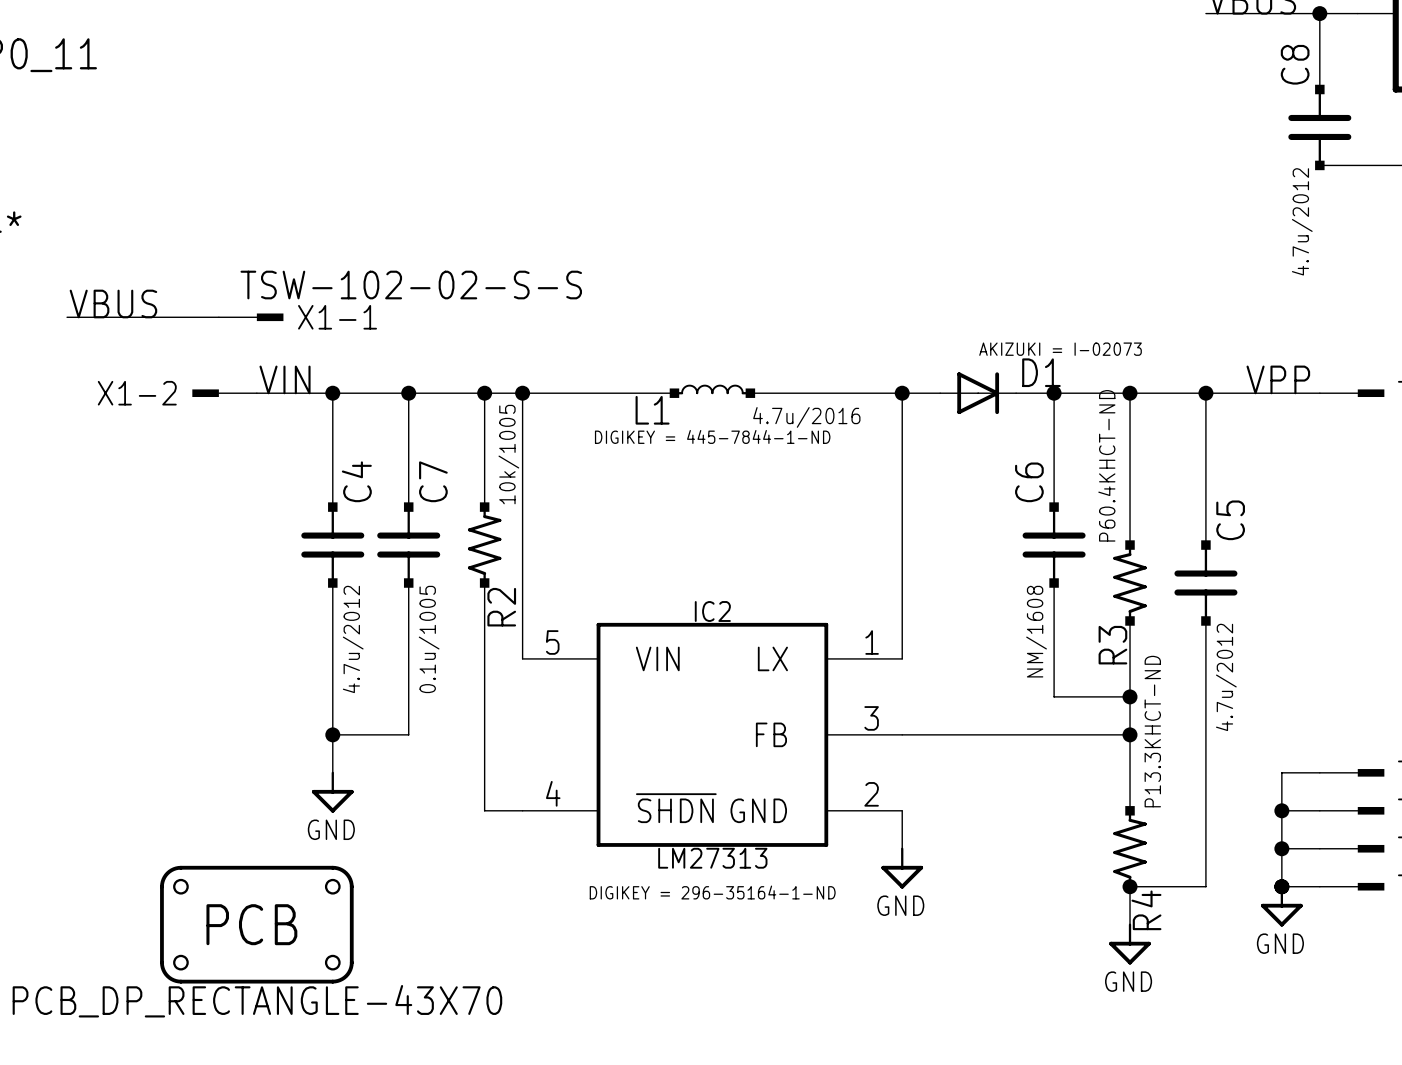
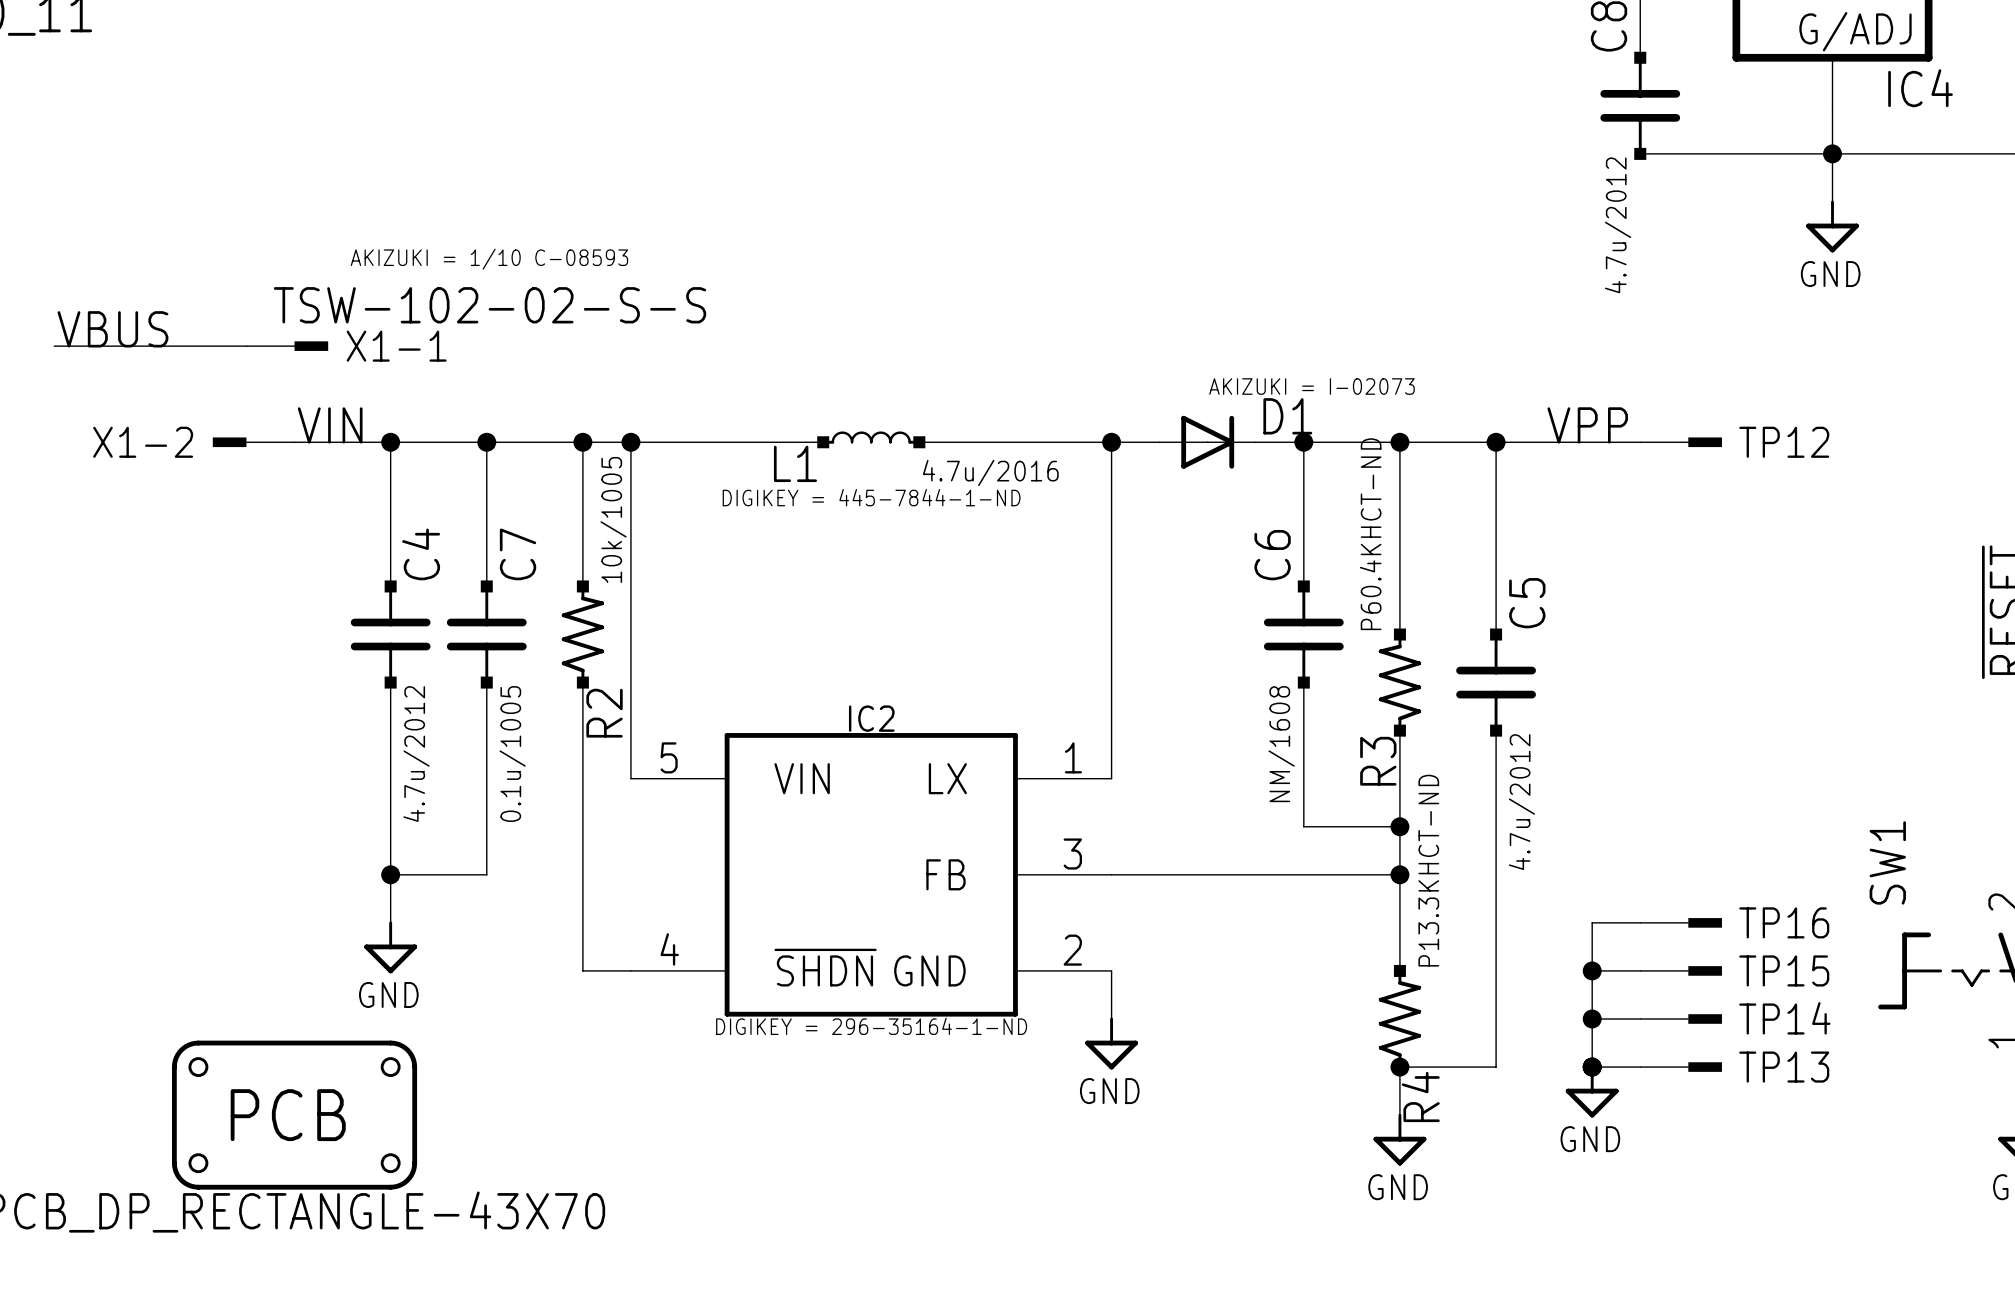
X1-1 text: none -> AKIZUKI = 1/10 C-08593 (489, 259)
IC2 value: LM27313 (712, 858) -> none
IC2 text position: DIGIKEY = 296-35164-1-ND (712, 892) -> DIGIKEY = 296-35164-1-ND (871, 1026)

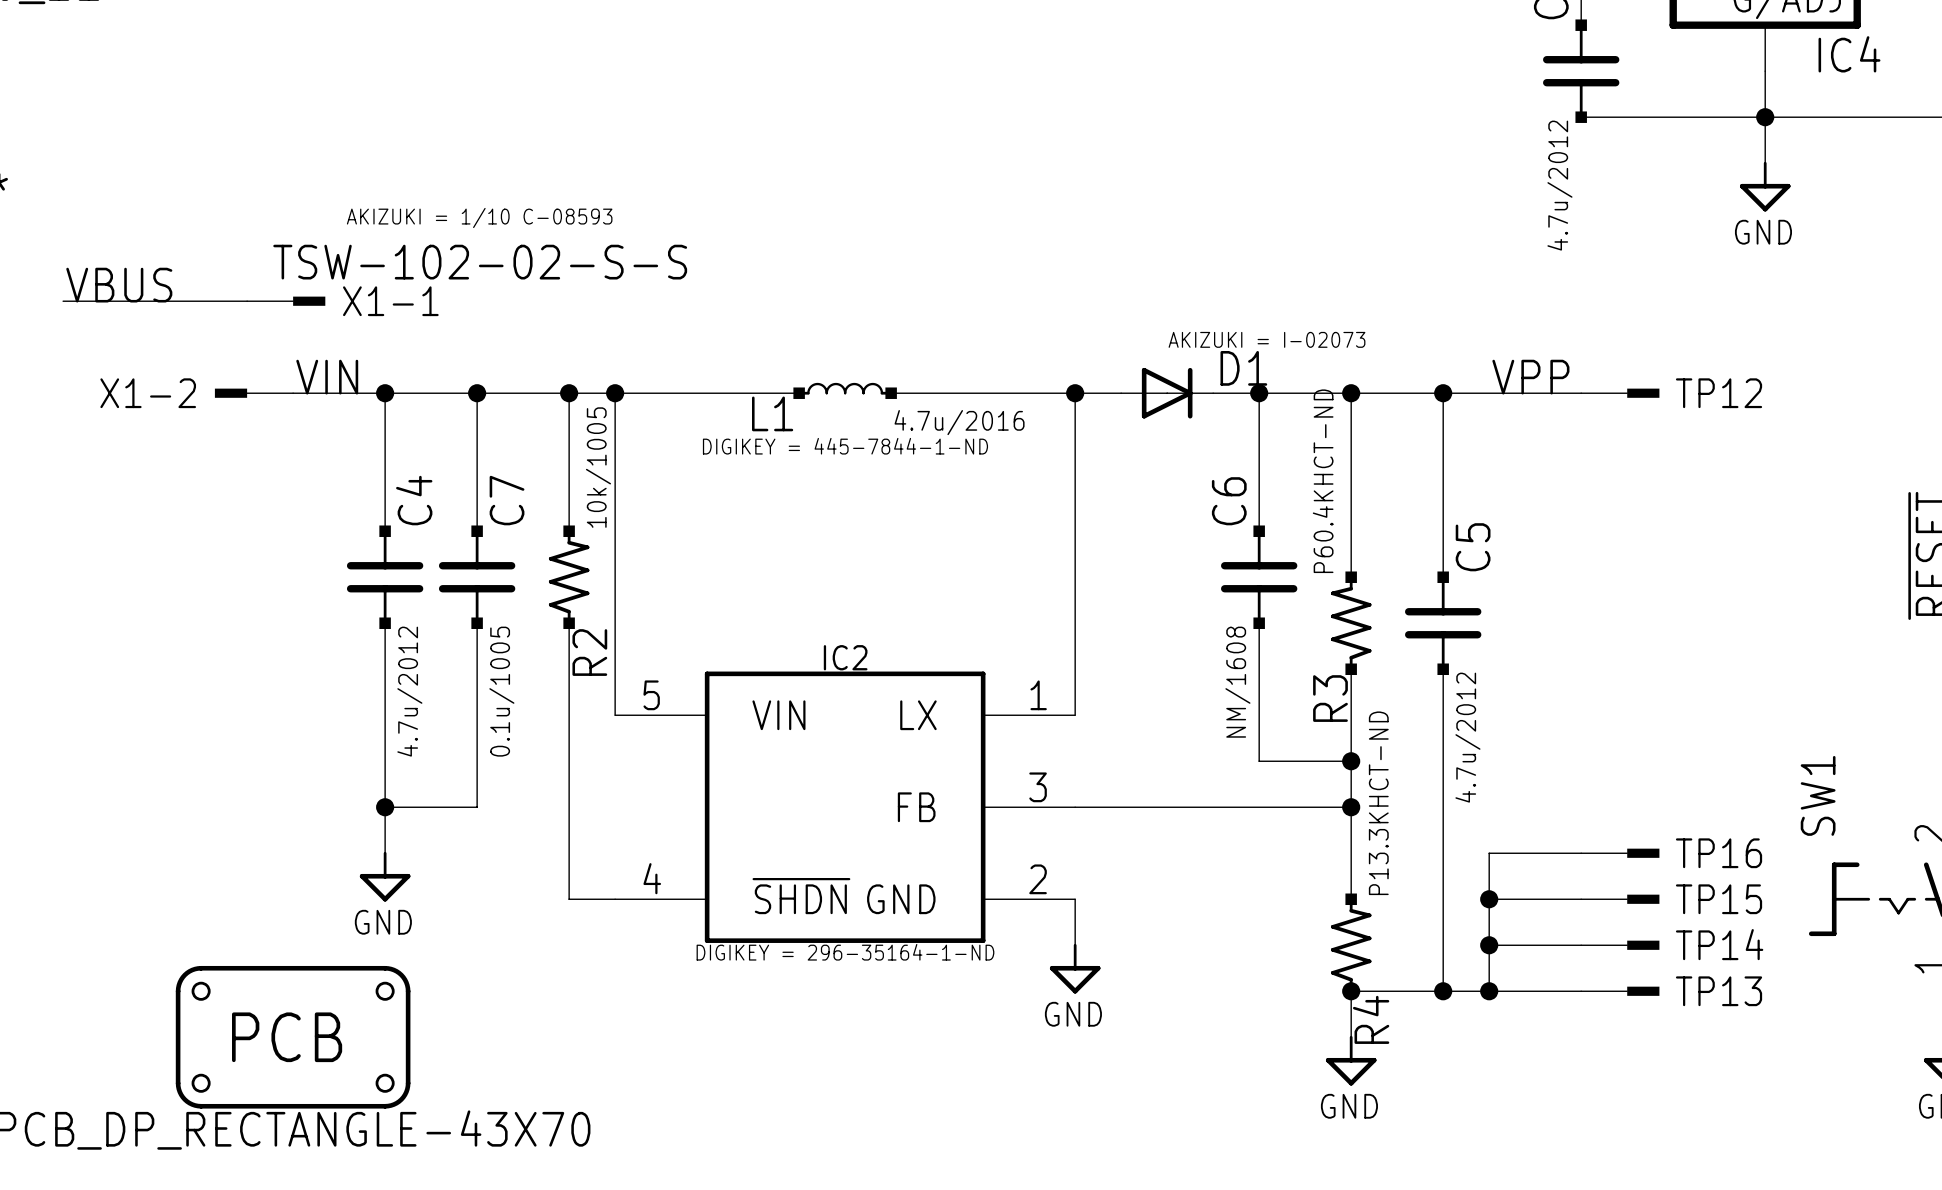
wire: (1592, 922) (1592, 1067) -> (1535, 853) (1489, 853) (1489, 991)
wire: none -> (1489, 899) (1535, 899)
junction: none -> (1489, 899)
junction: (1592, 970) -> none
wire: none -> (1489, 945) (1535, 945)
junction: none -> (1489, 945)
junction: (1592, 1019) -> none
wire: none -> (1443, 991) (1535, 991)
junction: none -> (1443, 991)
junction: none -> (1489, 991)
junction: (1592, 1067) -> none
power symbol: GND (1592, 1091) -> none

